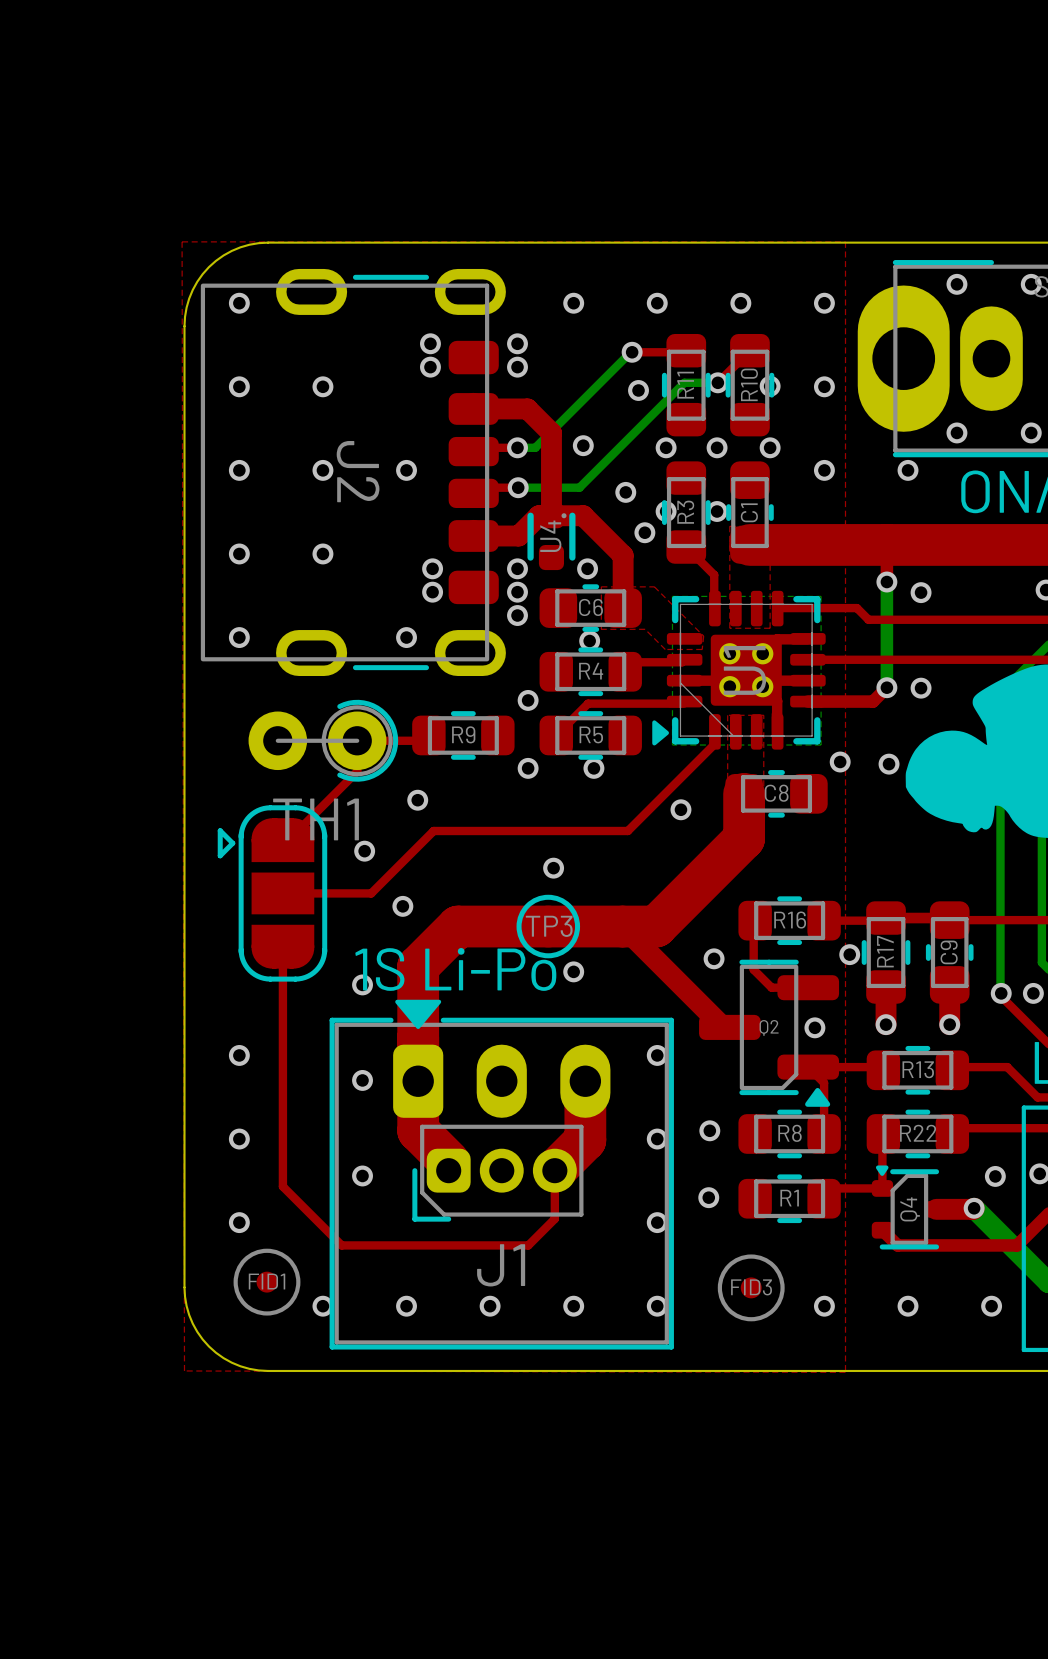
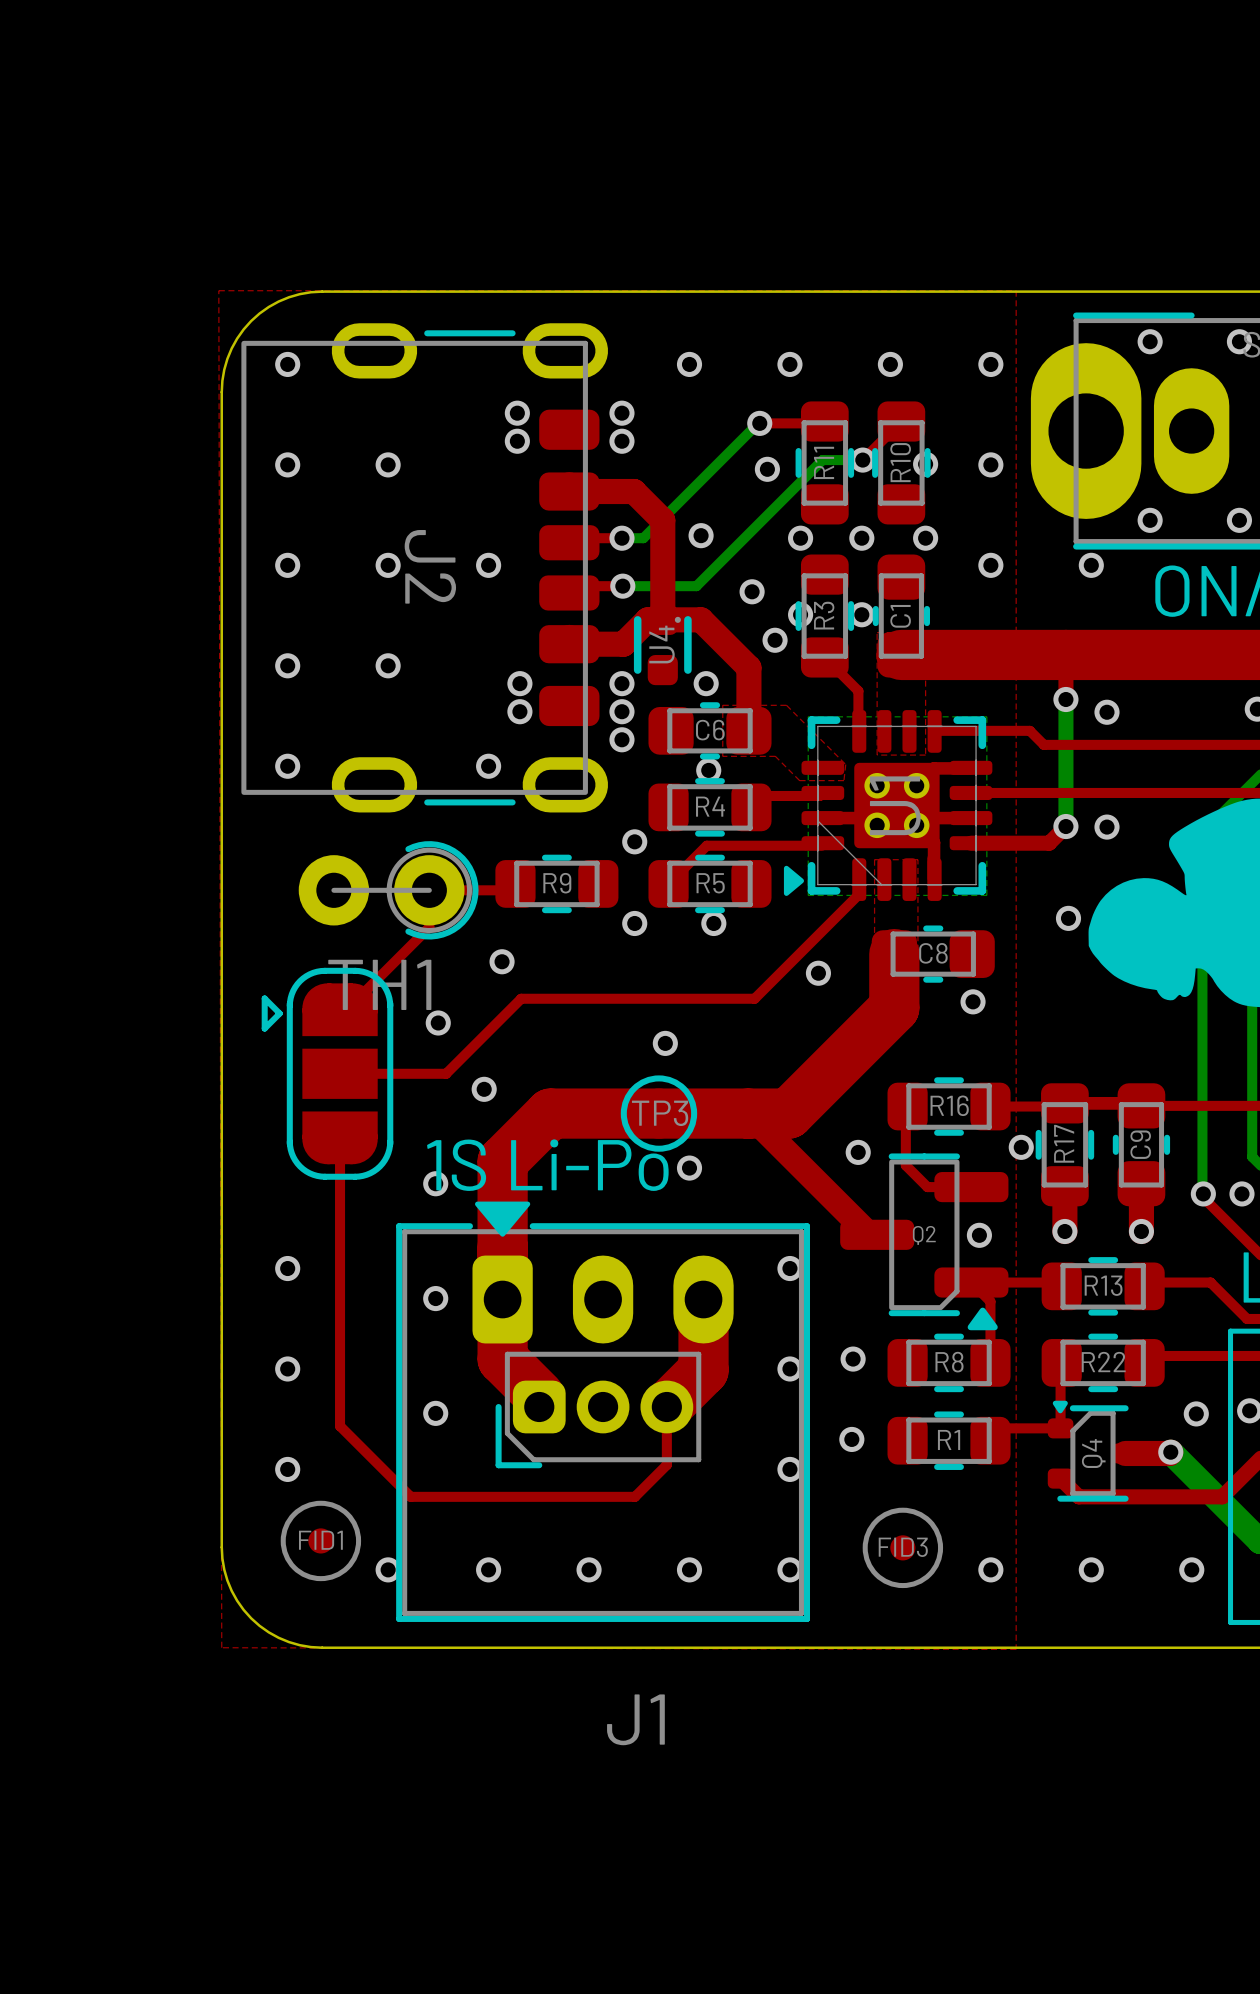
via position: (840, 762) -> (973, 1001)
J1 name position: J1 (501, 1265) -> J1 (635, 1719)

